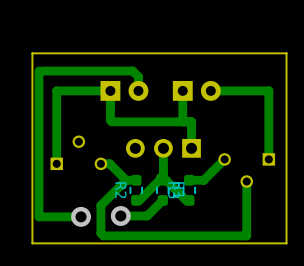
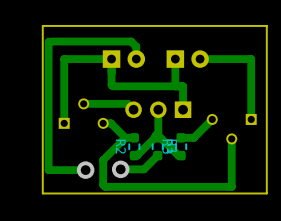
track: none -> (83, 103) (127, 103) (133, 109)

